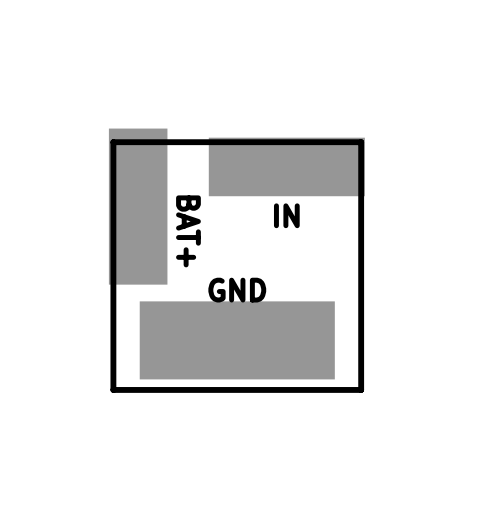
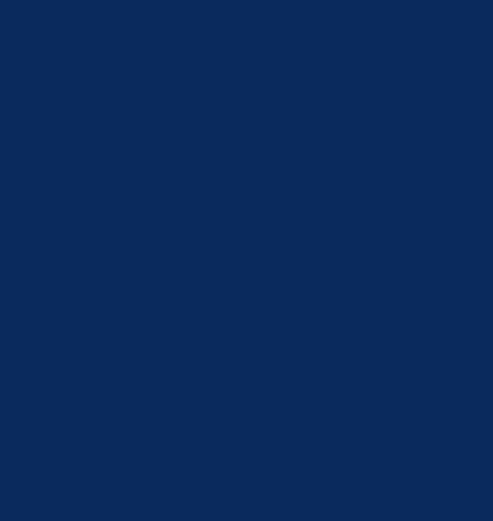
board edge: (361, 142) (361, 389) (113, 389) (113, 142) (361, 142) -> none
part: IN (286, 166) -> none
part: BAT+ (138, 206) -> none
part: GND (237, 340) -> none

